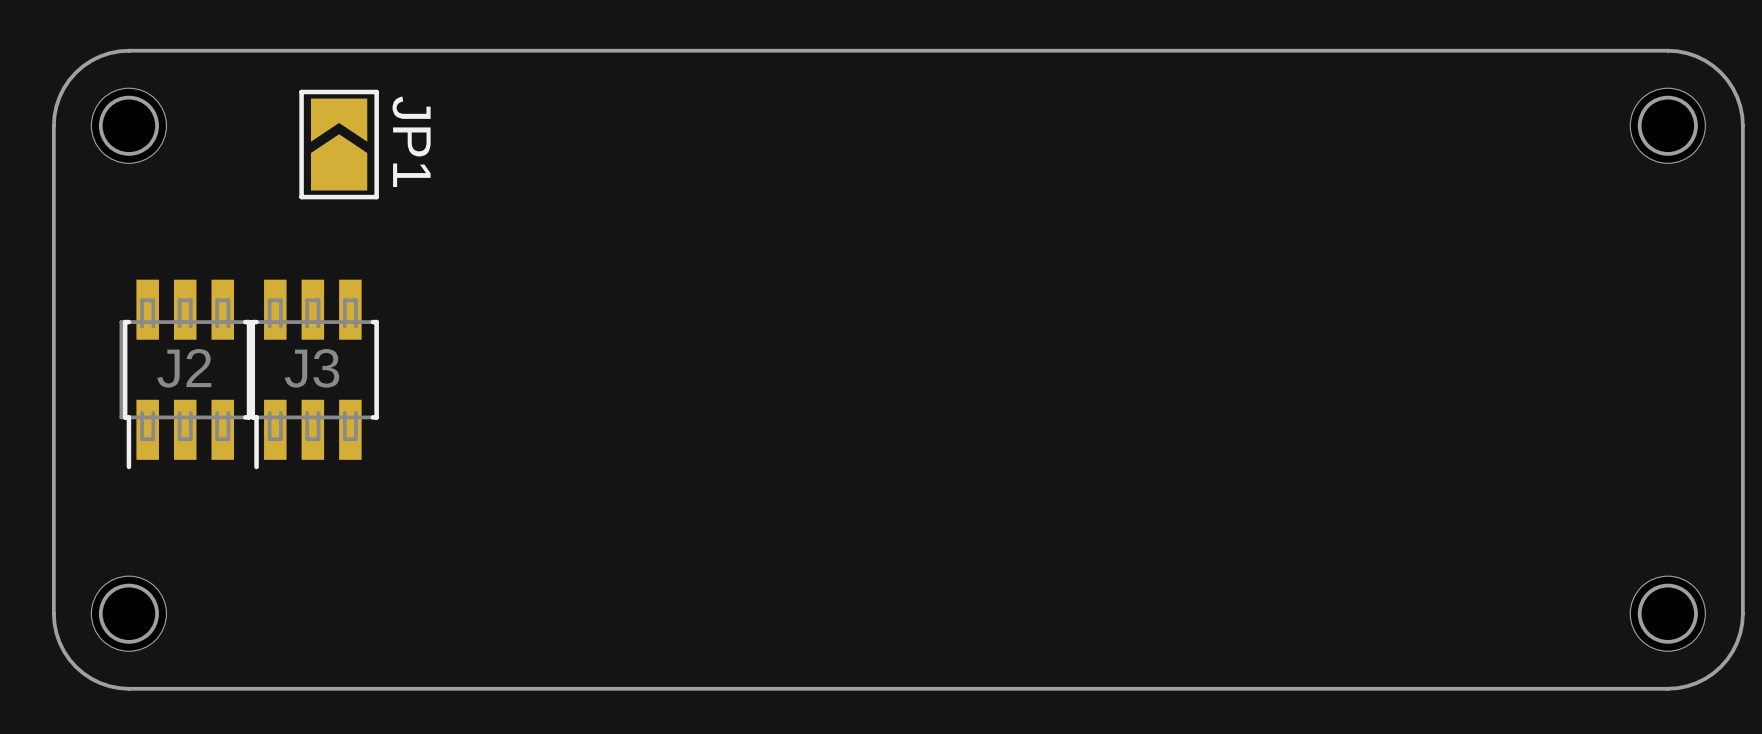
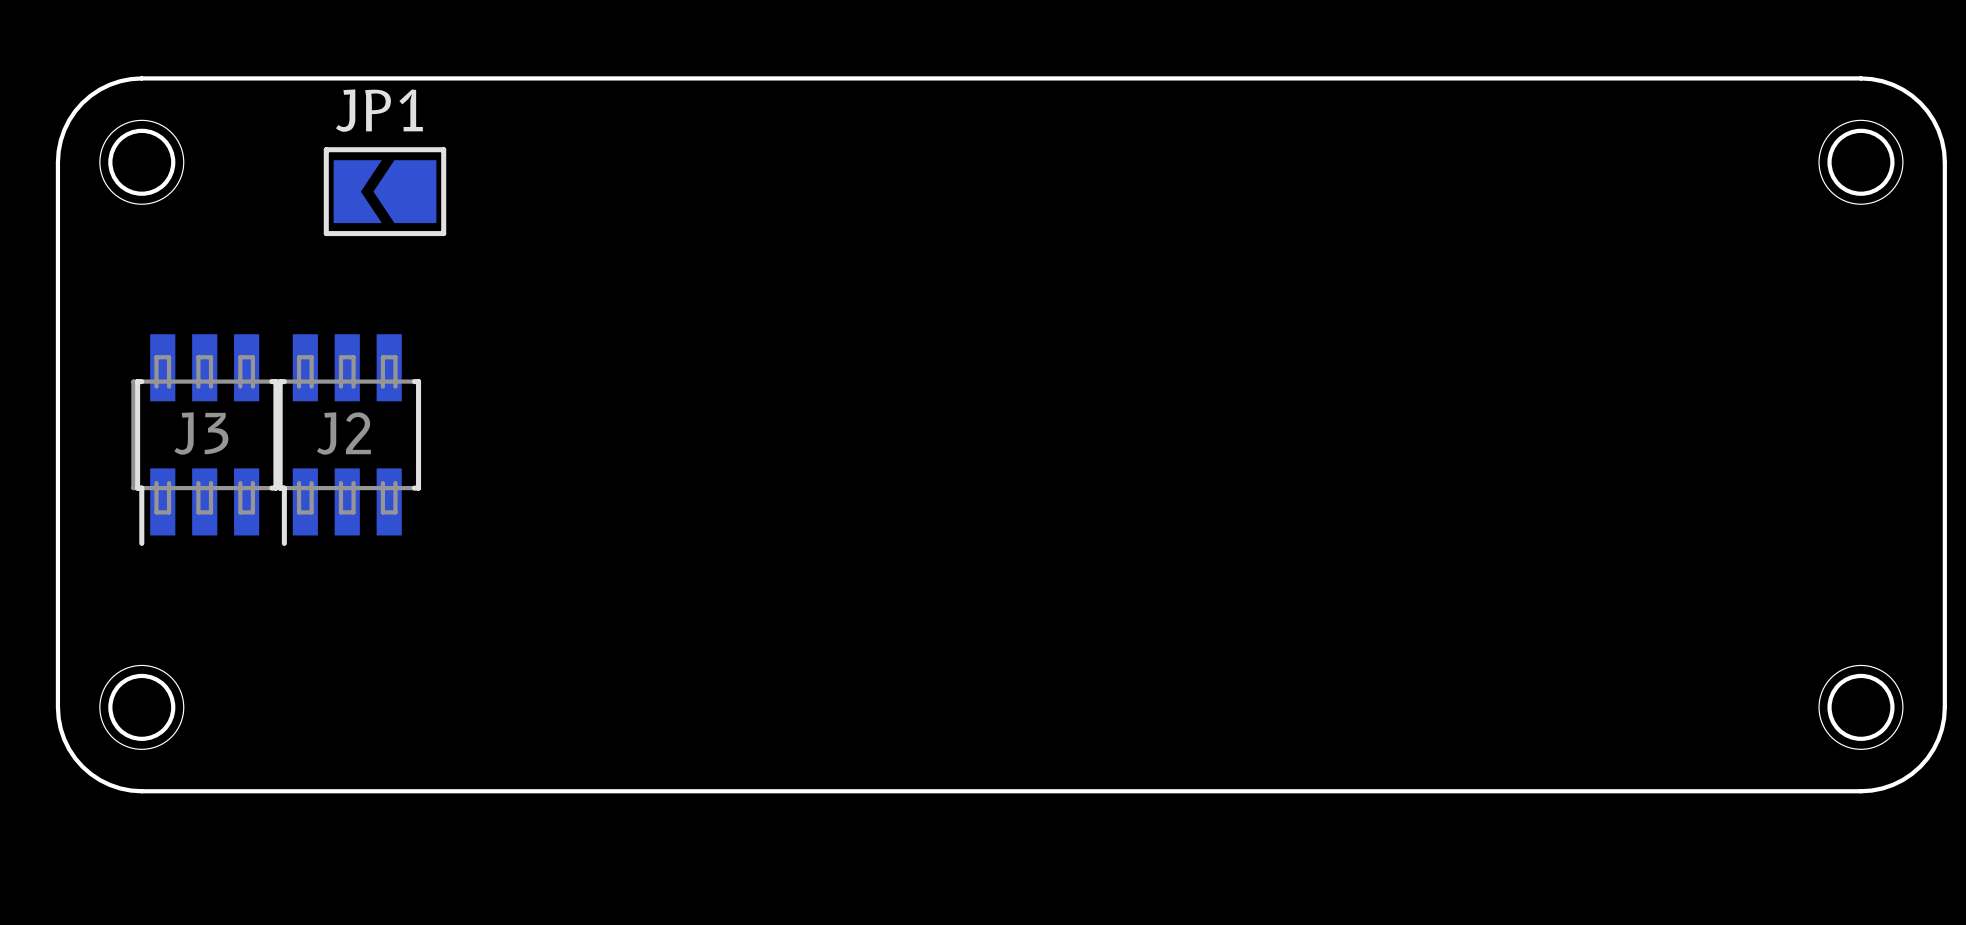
JP1 rotation: 0° (339, 144) -> 90° counterclockwise (385, 191)
J2 name: J2 (184, 368) -> J3 (201, 433)
J3 name: J3 (312, 368) -> J2 (343, 433)

